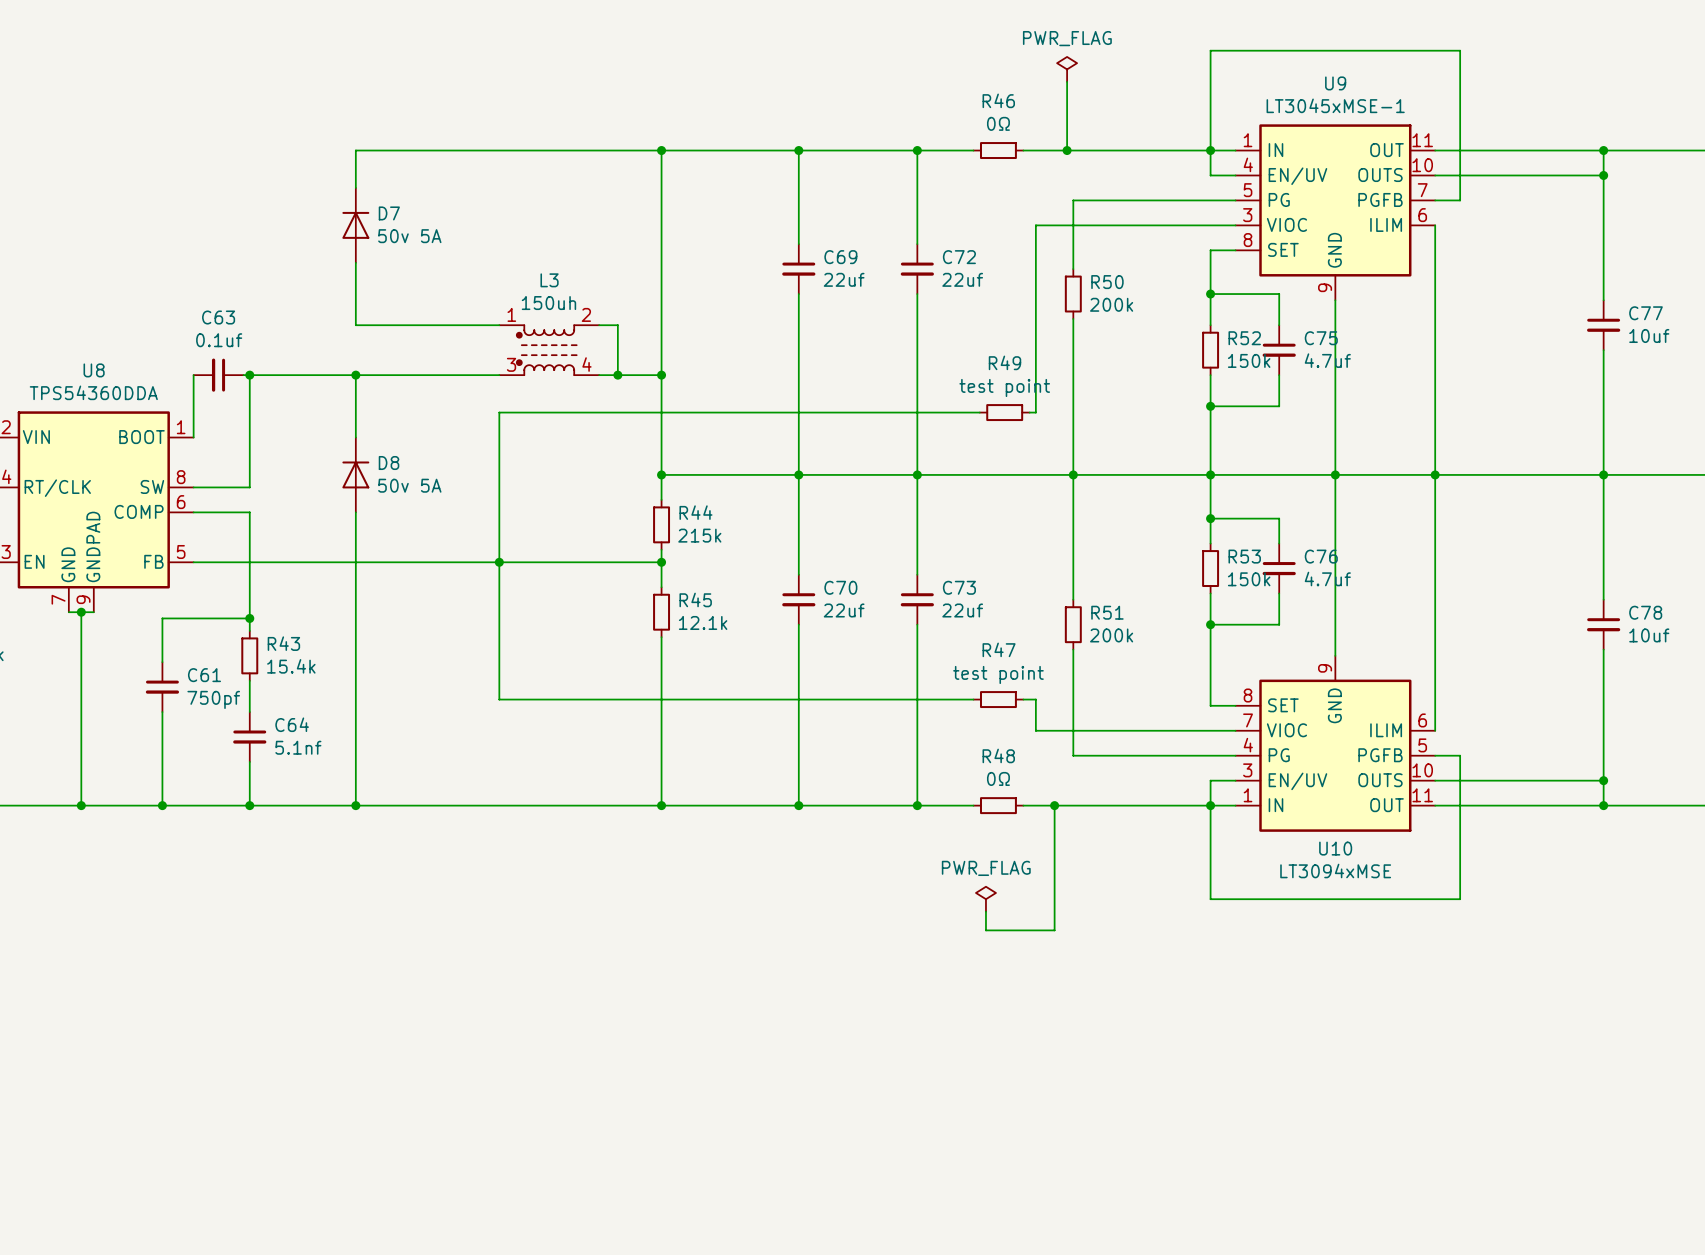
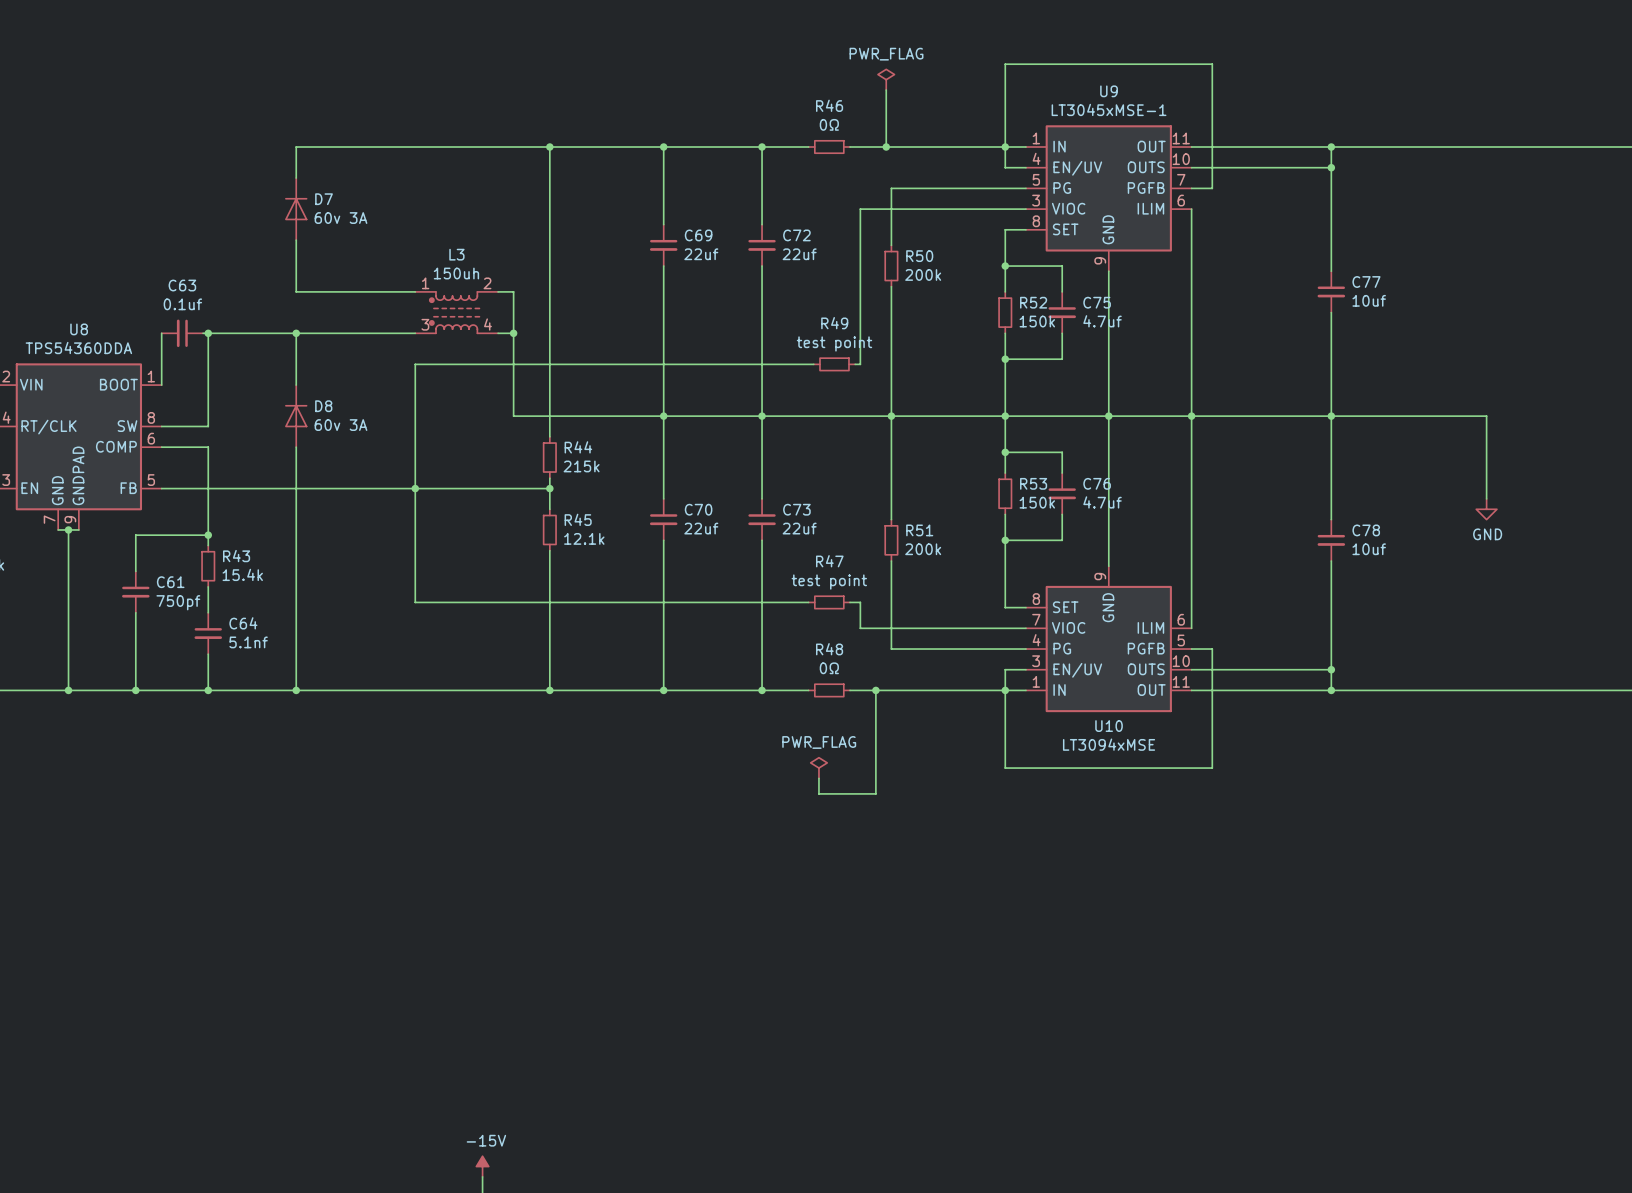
D7 value: 50v 5A (409, 236) -> 60v 3A (341, 218)
wire: (617, 375) (661, 375) -> (513, 333) (513, 416) (549, 416)
junction: (661, 375) -> none
junction: (661, 474) -> none
D8 value: 50v 5A (409, 485) -> 60v 3A (341, 425)

